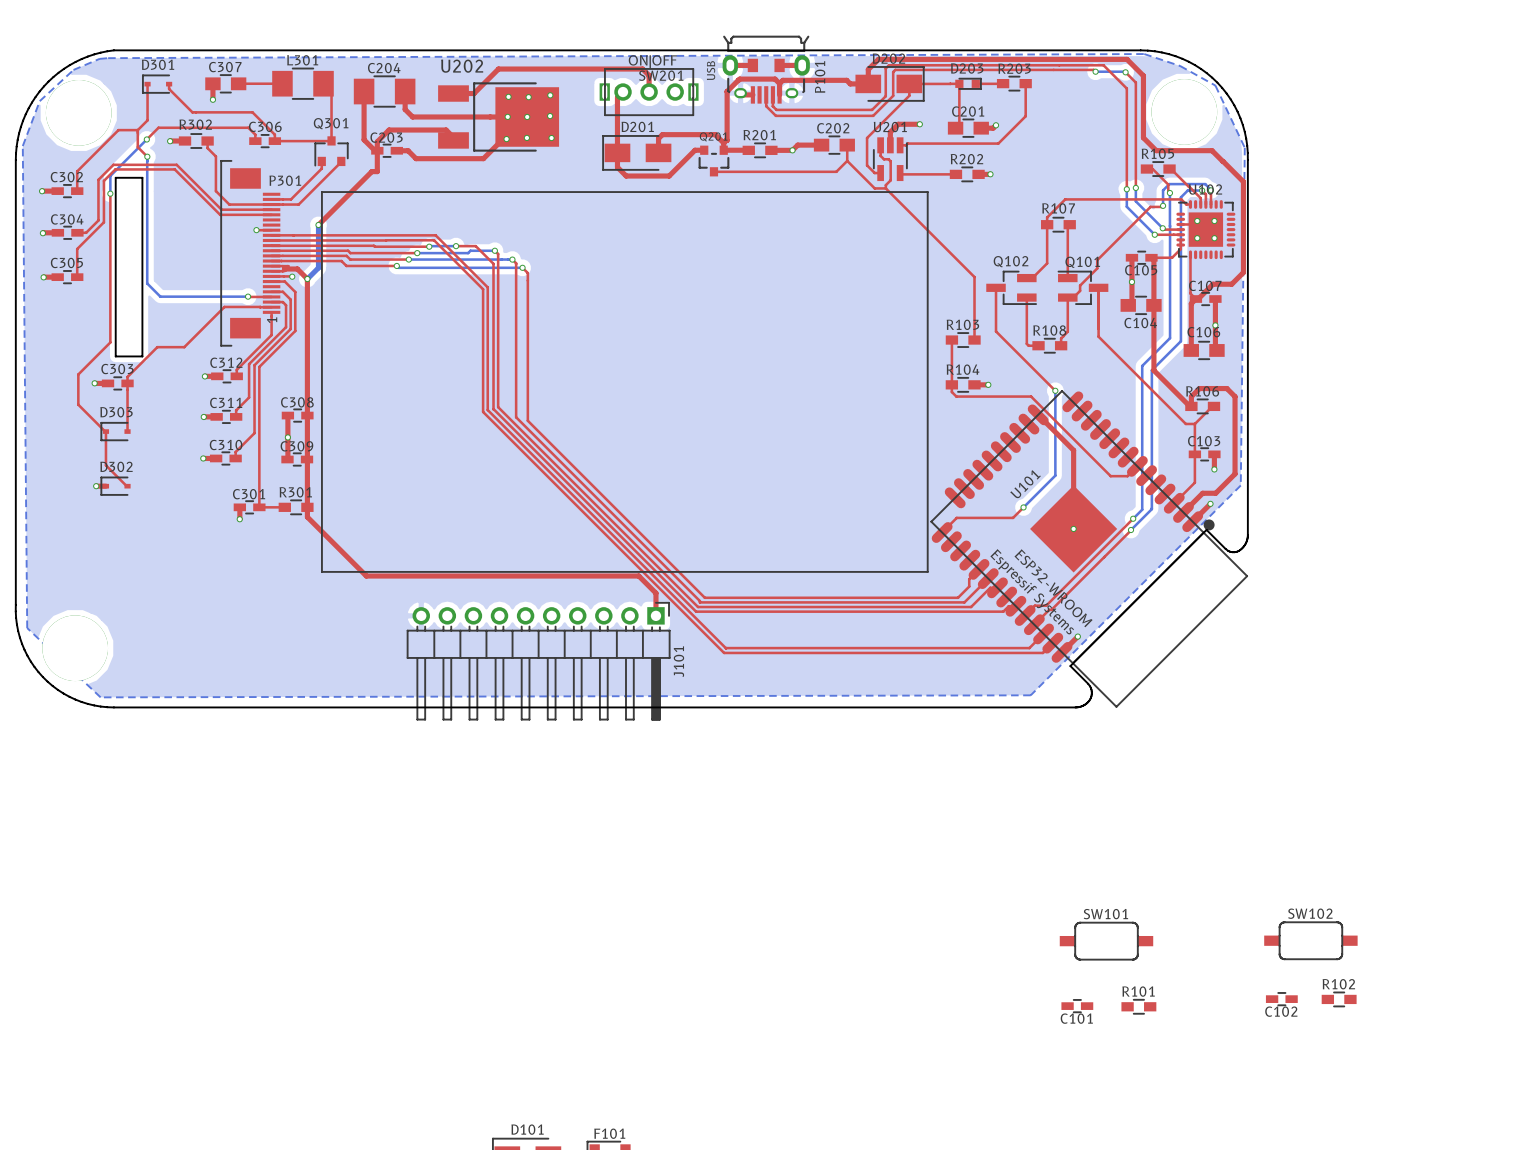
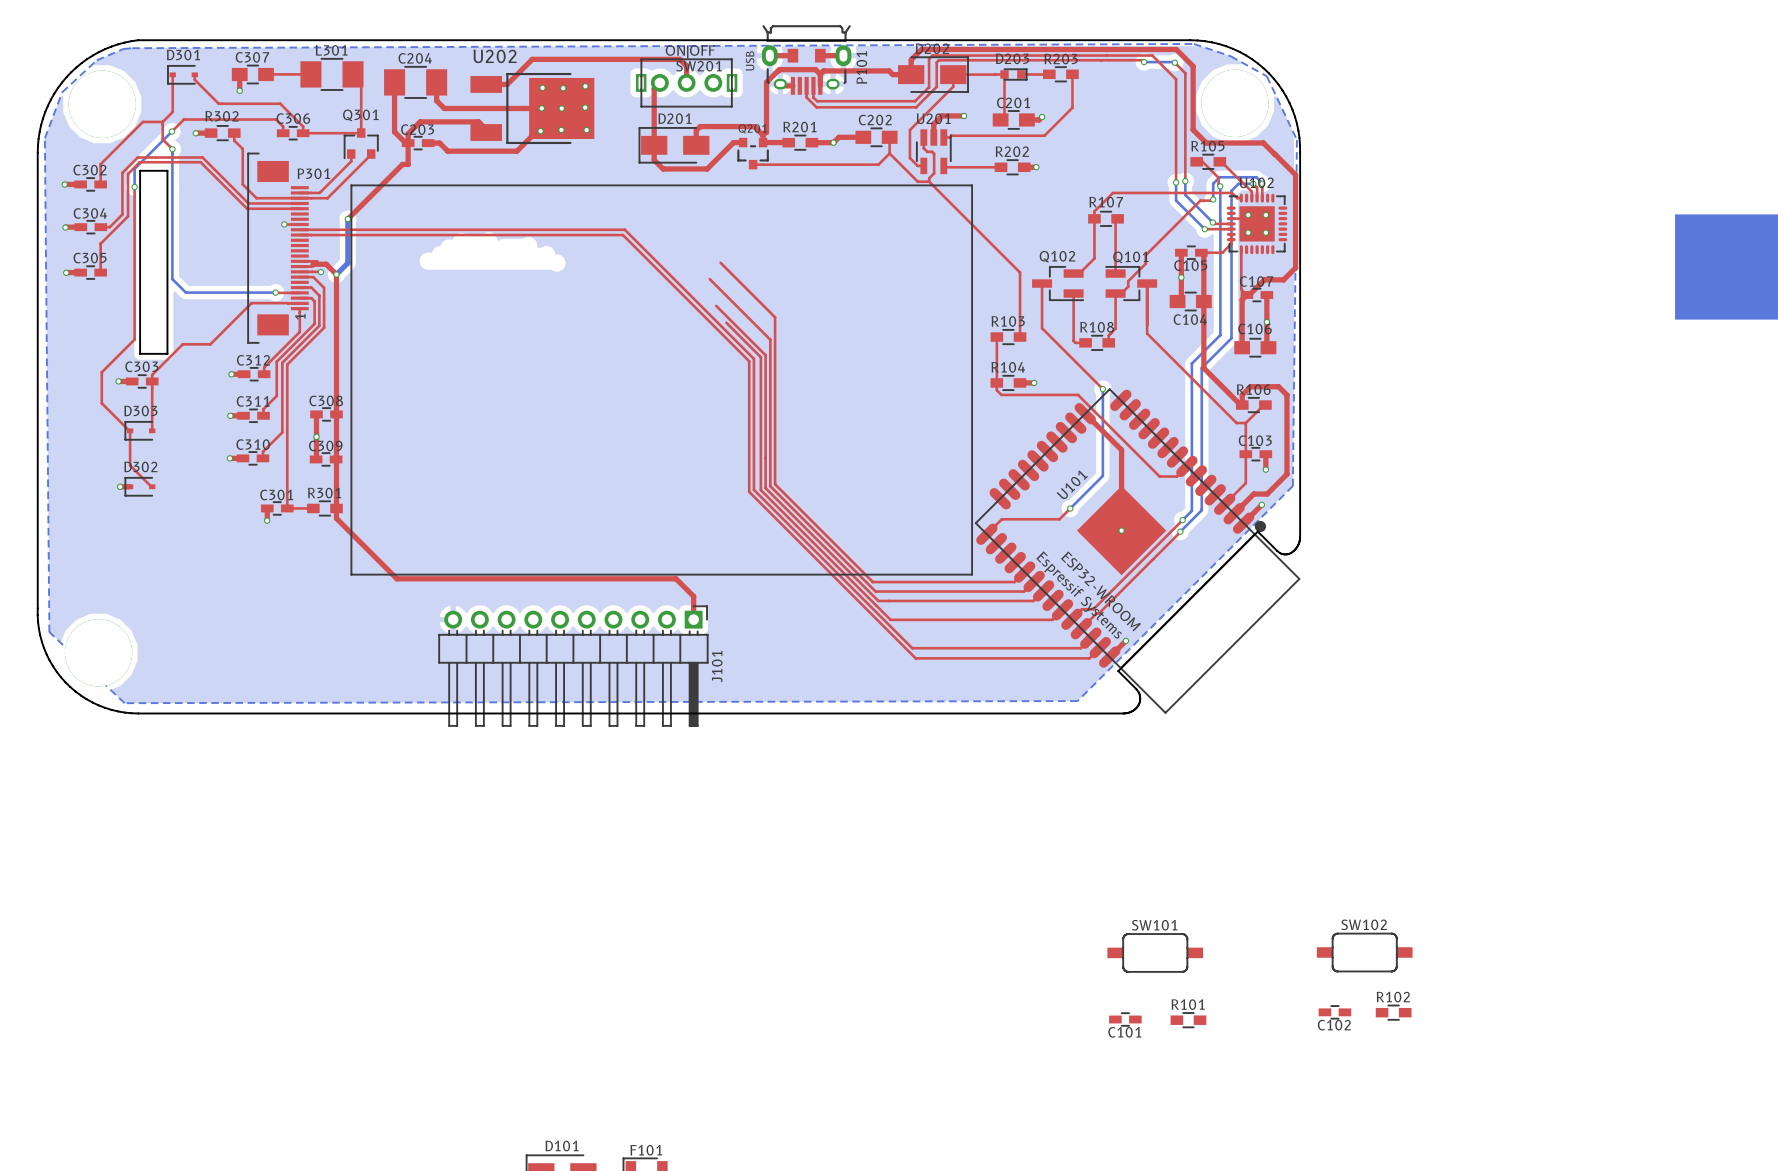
top track: (435, 235) (487, 287) (487, 410) (726, 648) -> (467, 229) (624, 229) (753, 358) (753, 489) (912, 648) (1080, 648)
top track: (386, 240) (434, 240) (483, 289) (483, 411) (724, 652) (1043, 652) -> (417, 235) (622, 235) (749, 361) (749, 491) (915, 658) (1090, 657)
top track: (271, 245) (429, 246) -> none
via: (429, 246) -> none
bottom track: (456, 246) (429, 246) -> none
top track: (456, 246) (475, 246) (493, 263) (493, 409) (696, 611) (1003, 611) (1008, 606) (1015, 606) -> (726, 322) (760, 357) (760, 490) (890, 619) (1052, 619) (1062, 609)
via: (456, 246) -> none
top track: (271, 250) (417, 253) -> none
bottom track: (494, 250) (470, 250) (468, 253) (417, 253) -> none
top track: (494, 250) (498, 254) (498, 407) (698, 607) (971, 607) (990, 587) (997, 587) -> (716, 305) (765, 355) (765, 488) (878, 600) (1033, 600) (1043, 590)
via: (494, 250) -> none
via: (417, 253) -> none
top track: (271, 255) (346, 255) (350, 259) (408, 259) -> none
via: (408, 259) -> none
top track: (512, 259) (516, 263) (516, 417) (699, 602) (964, 602) (978, 588) -> (709, 279) (770, 339) (770, 486) (875, 591) (1024, 591)
via: (512, 259) -> none
top track: (271, 261) (341, 261) (346, 265) (396, 265) -> none
bottom track: (396, 265) (398, 267) (522, 267) -> none
via: (396, 265) -> none
top track: (522, 267) (527, 273) (527, 420) (704, 597) (958, 597) (969, 586) (969, 579) -> (720, 262) (775, 317) (775, 484) (872, 582) (1014, 582)
via: (522, 267) -> none
top track: (1033, 643) (1029, 648) (726, 648) -> none

